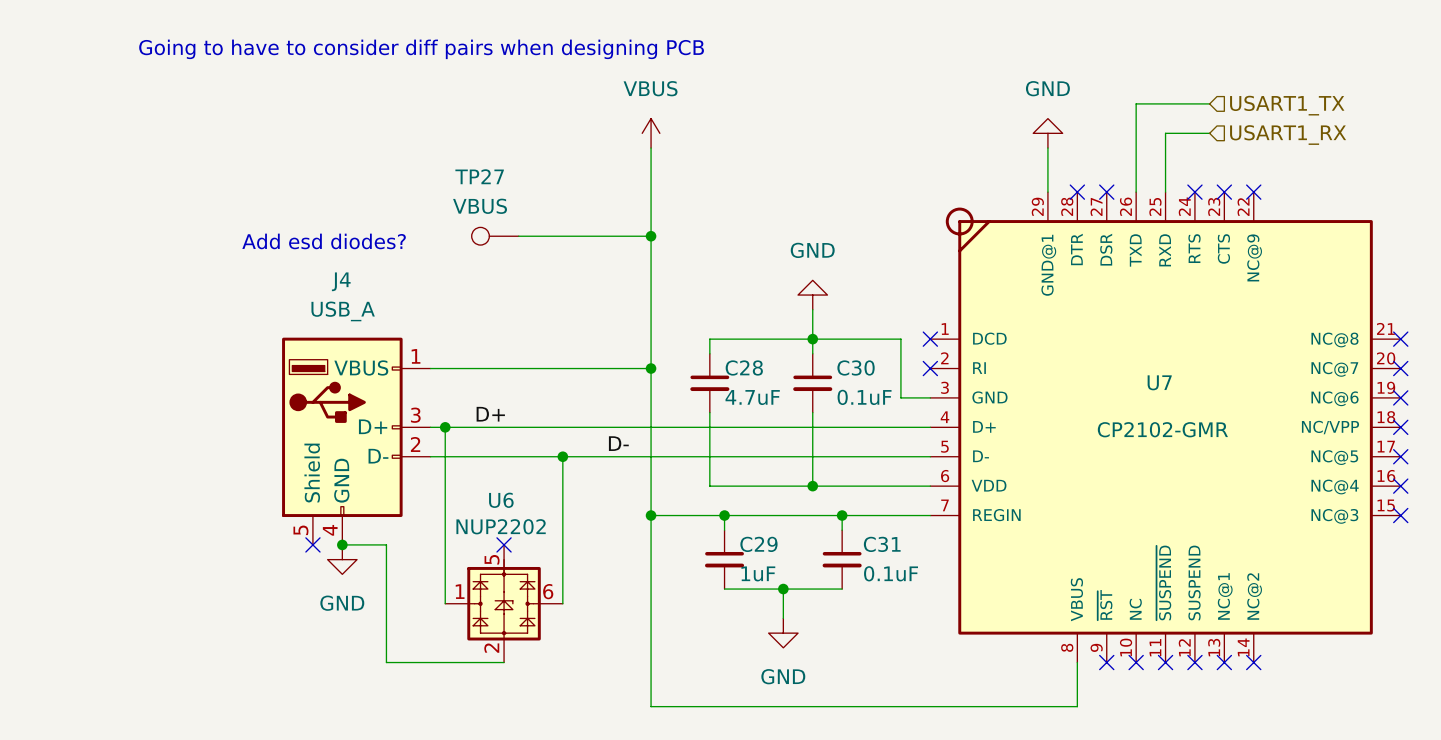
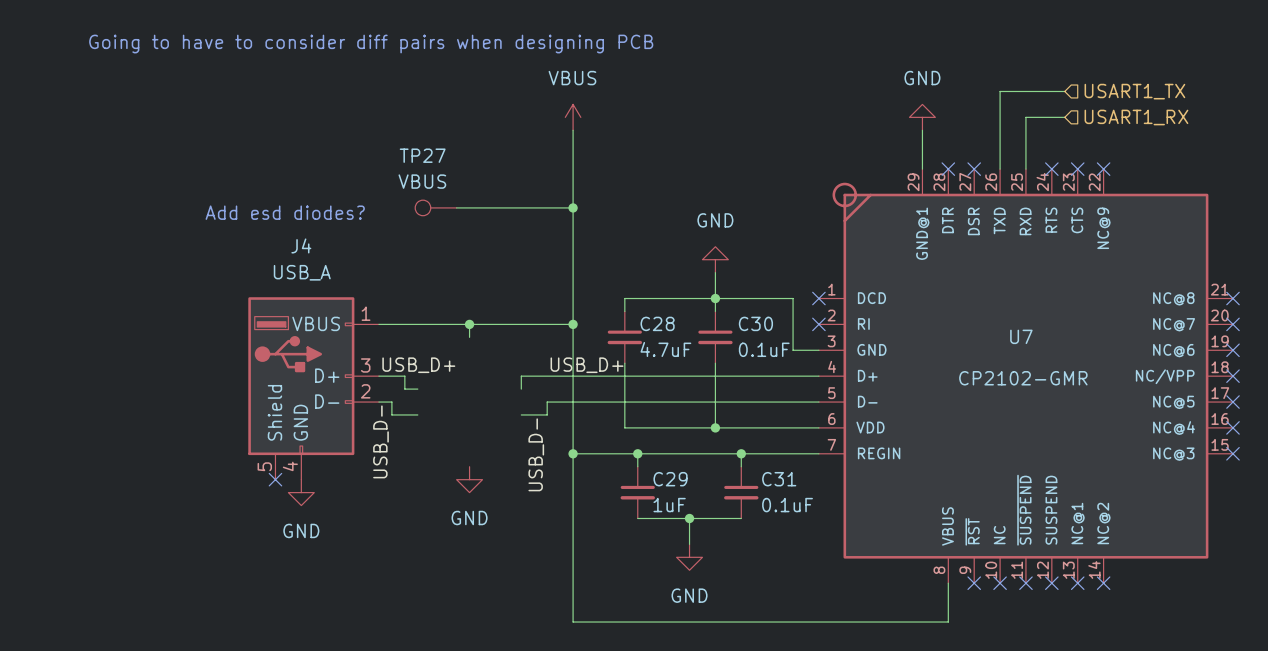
wire: none -> (469, 324) (469, 337)
junction: none -> (469, 324)
label: D+ (490, 414) -> none
label: none -> USB_D+ (418, 365)
label: none -> USB_D+ (587, 365)
wire: (445, 427) (445, 456) (621, 456) -> (521, 414) (547, 414) (547, 402)
junction: (445, 427) -> none
wire: (459, 427) (592, 427) -> (404, 376) (404, 389) (417, 389)
wire: none -> (521, 376) (521, 389)
label: D- (618, 443) -> none
wire: (562, 456) (562, 603) -> none
junction: (562, 456) -> none
wire: (445, 471) (445, 603) -> (391, 414) (417, 414)
label: none -> USB_D- (380, 441)
label: none -> USB_D- (536, 454)
wire: (342, 544) (386, 544) (386, 662) (504, 662) -> none
junction: (342, 544) -> none
no-connect mark: (504, 544) -> none
power symbol: none -> GND (469, 479)
U6: NUP2202 (504, 603) -> none

